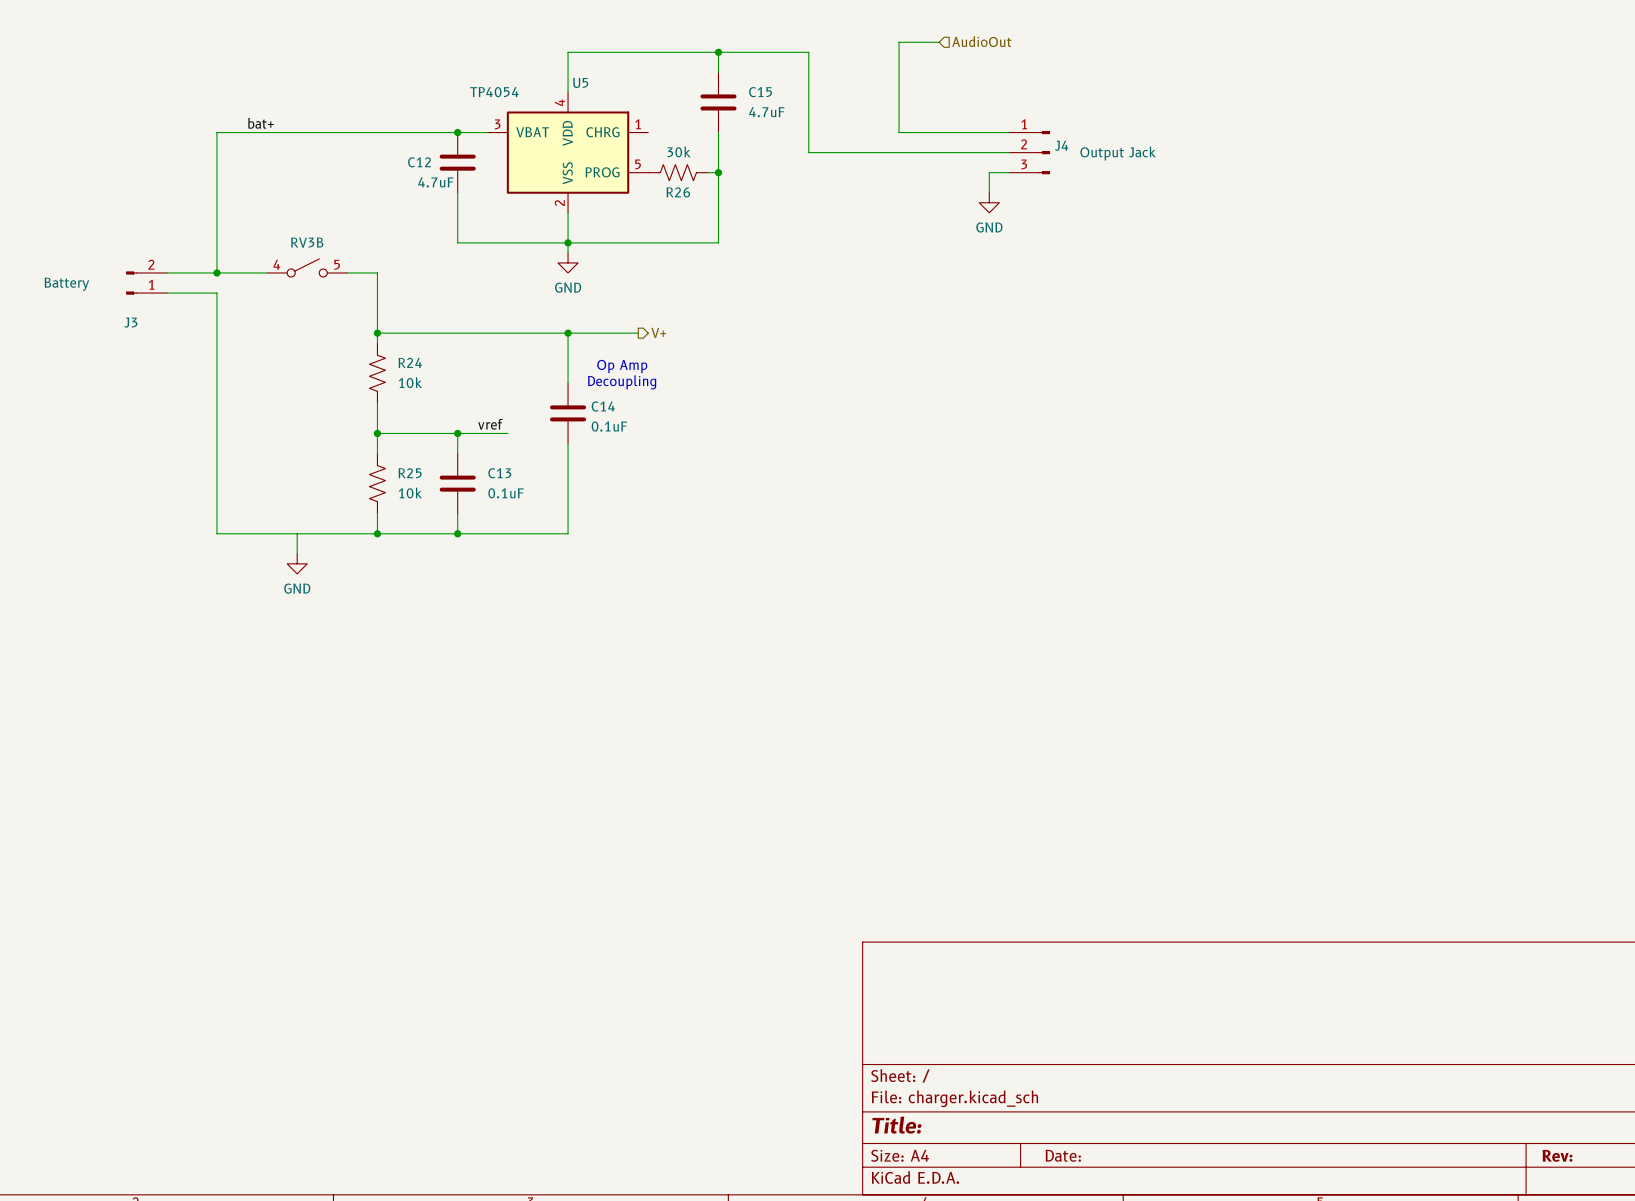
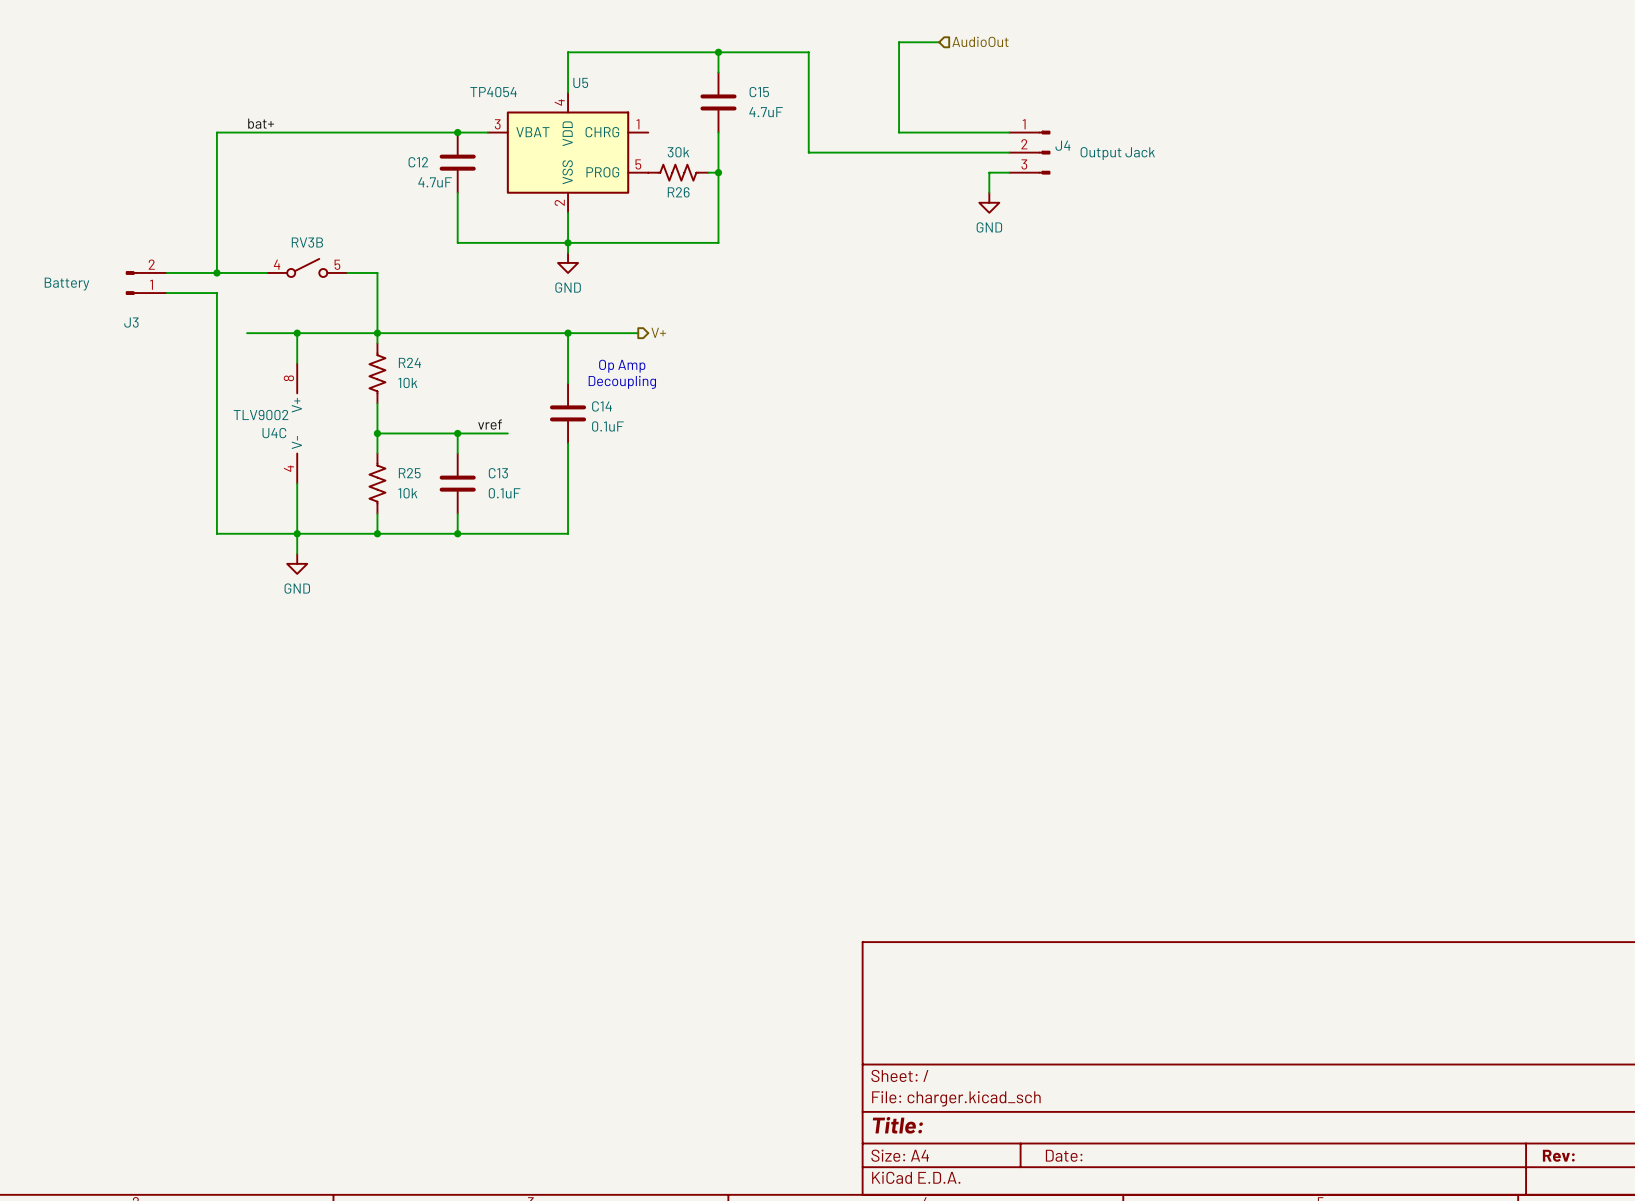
wire: none -> (247, 333) (377, 333)
wire: none -> (297, 333) (297, 363)
junction: none -> (297, 333)
U4C: none -> TLV9002 (297, 423)
wire: none -> (297, 483) (297, 533)
junction: none -> (297, 533)

